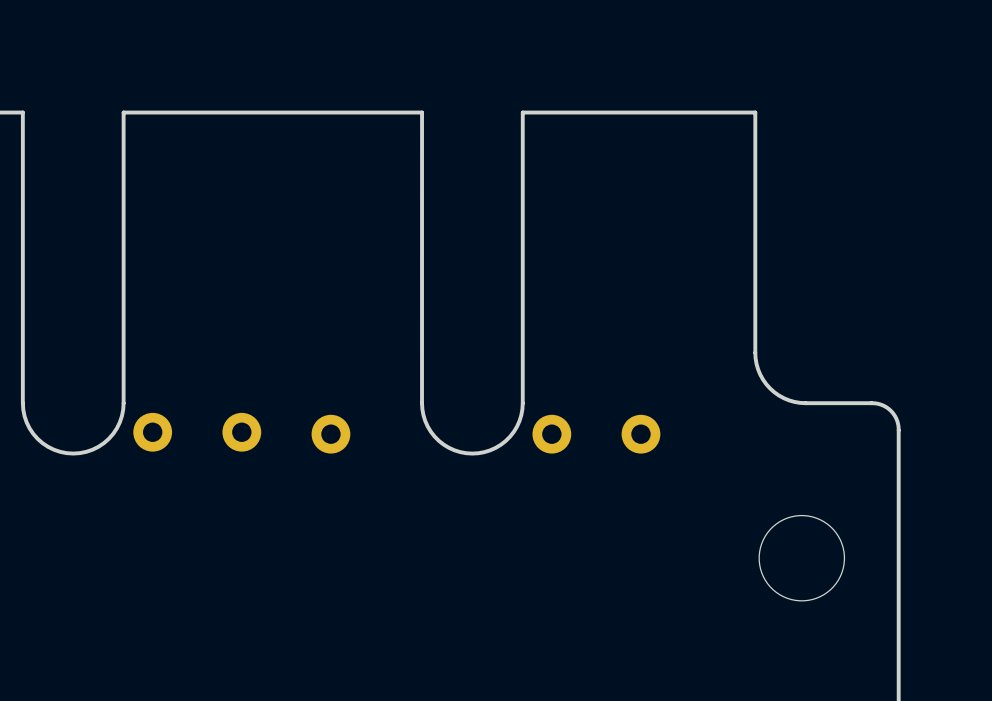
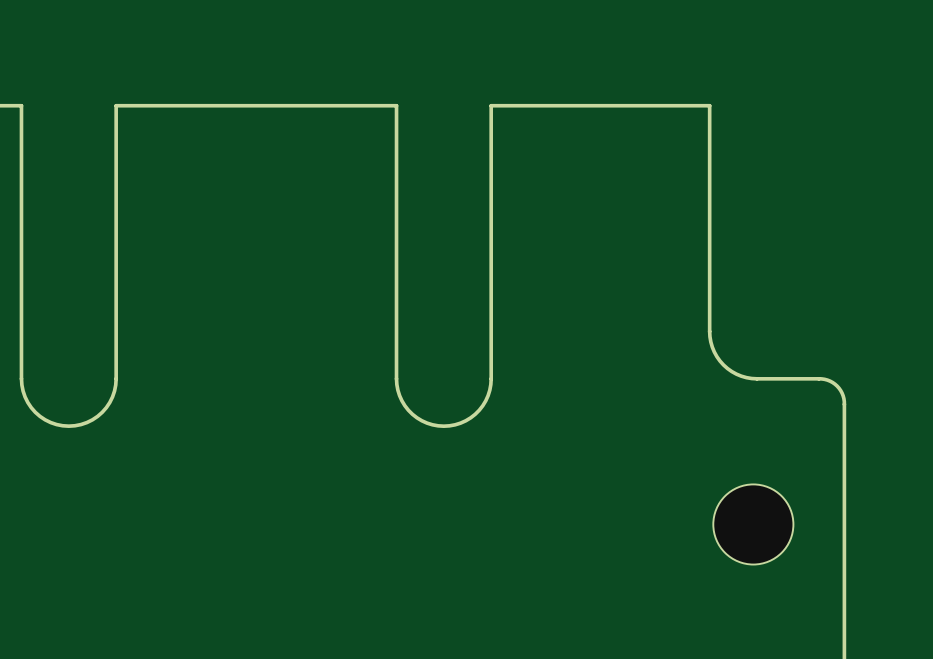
part: (152, 432) -> none
part: (241, 432) -> none
part: (330, 434) -> none
part: (551, 434) -> none
part: (640, 434) -> none

